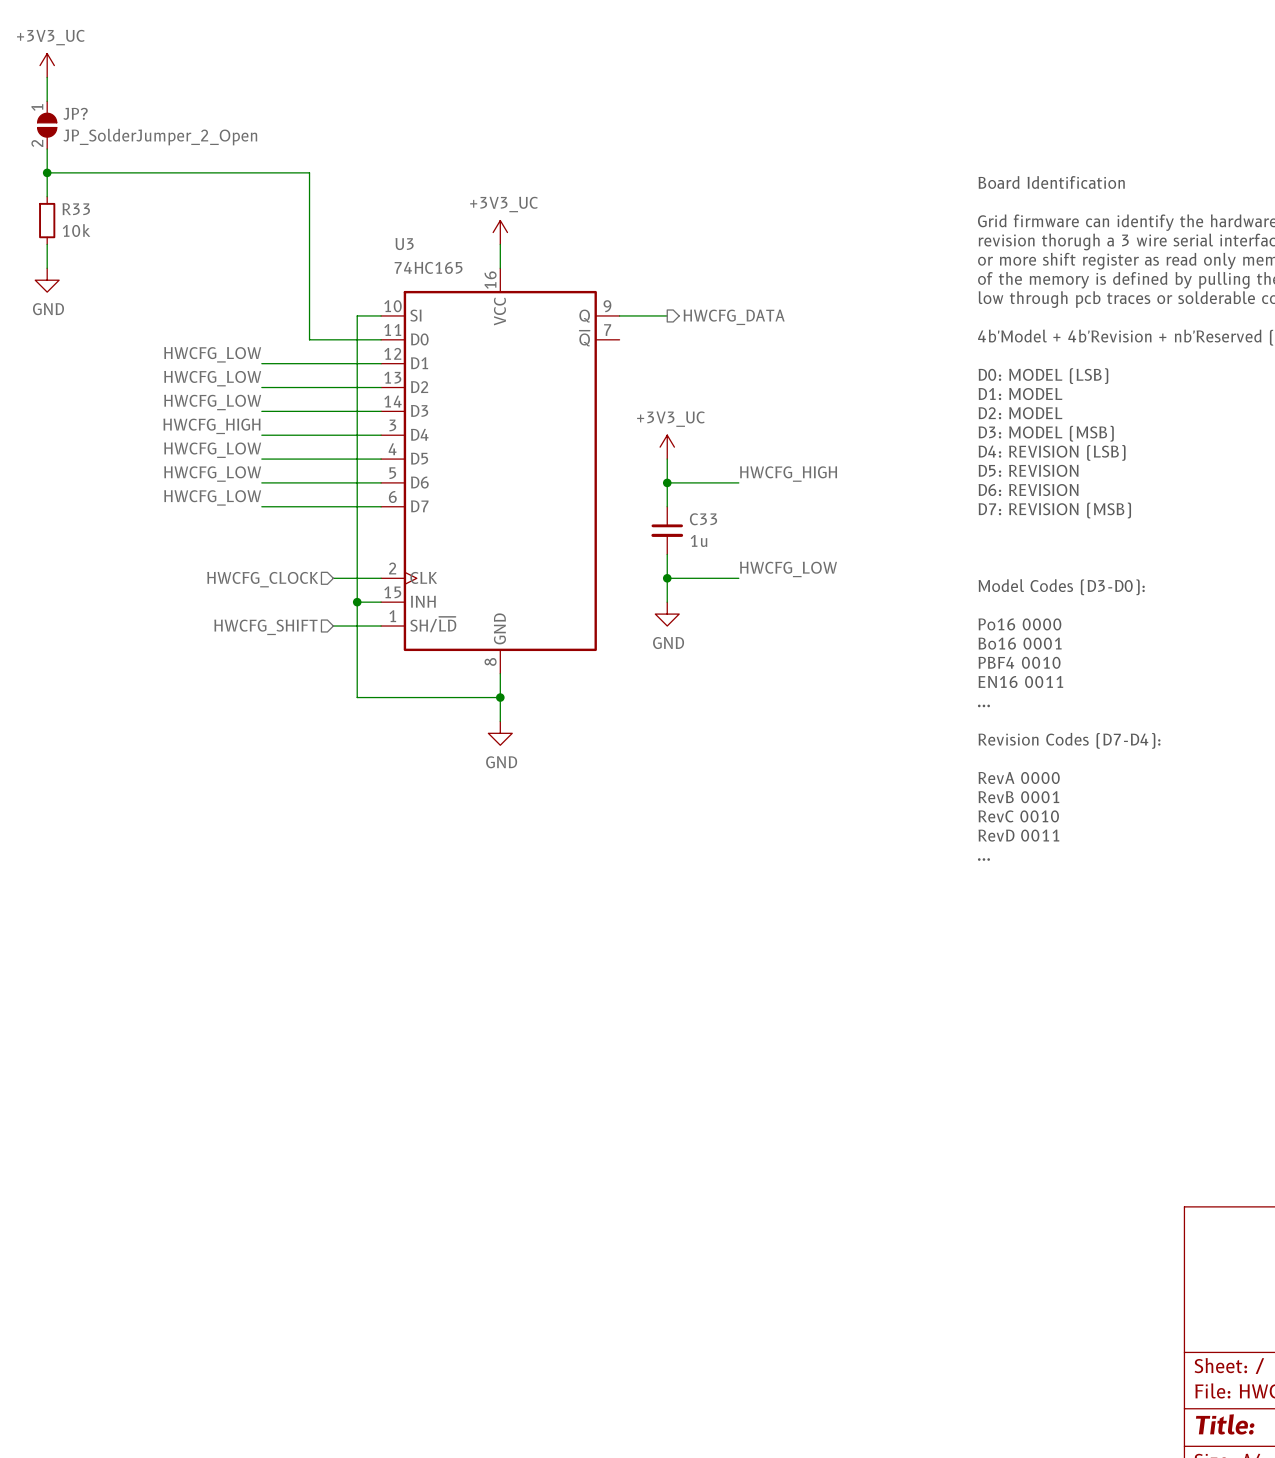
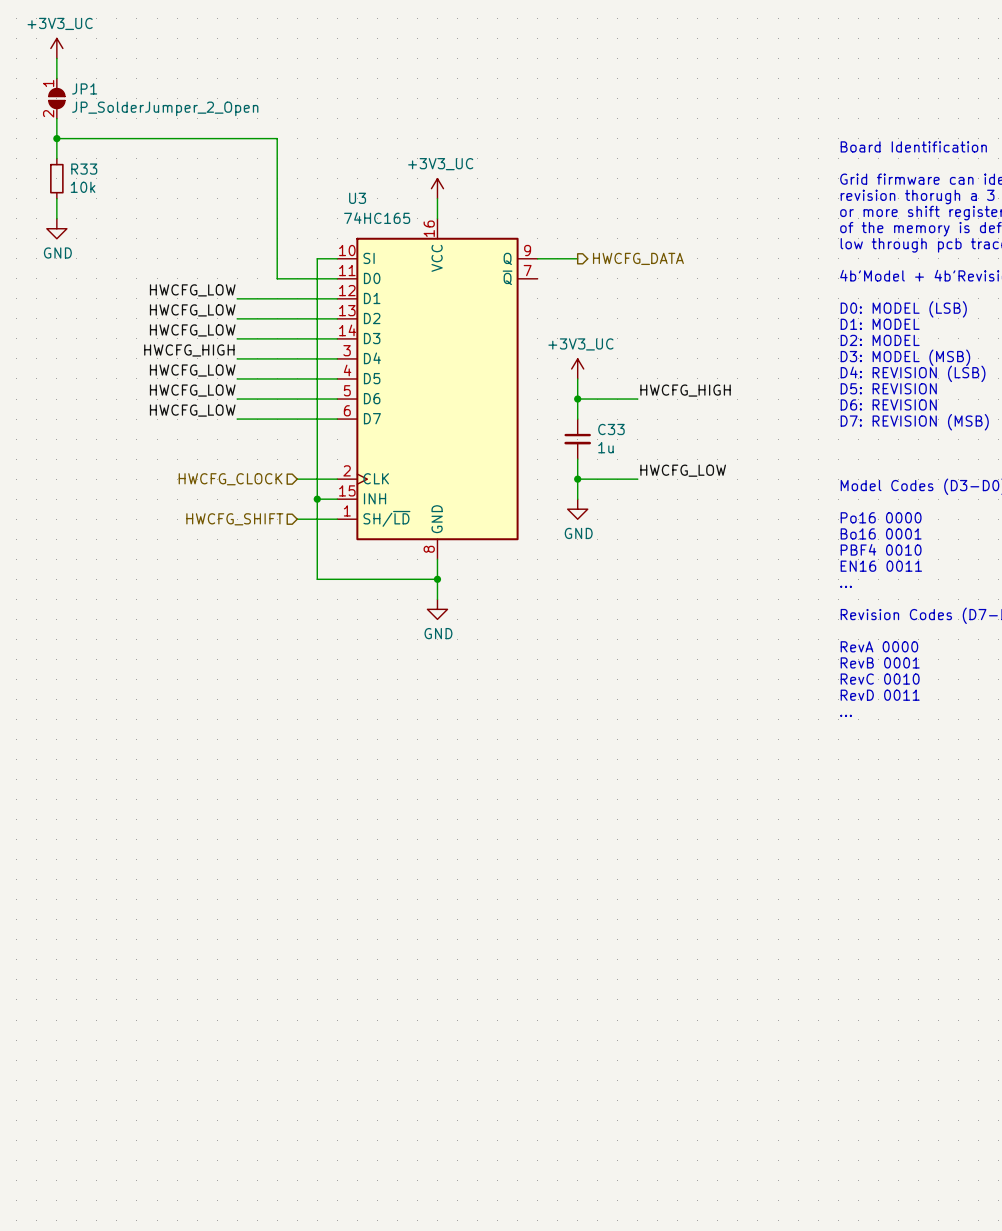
JP? name: JP? (75, 113) -> JP1 (84, 88)

